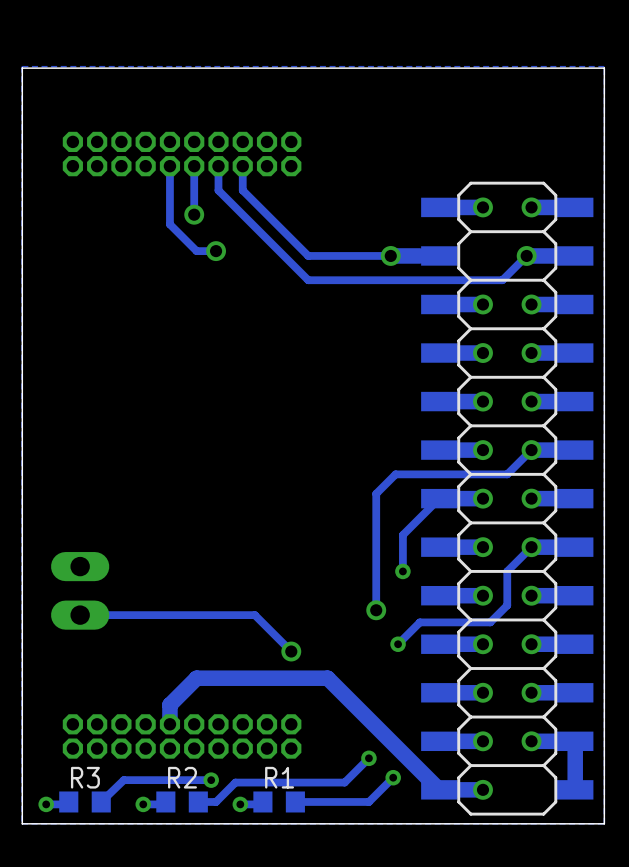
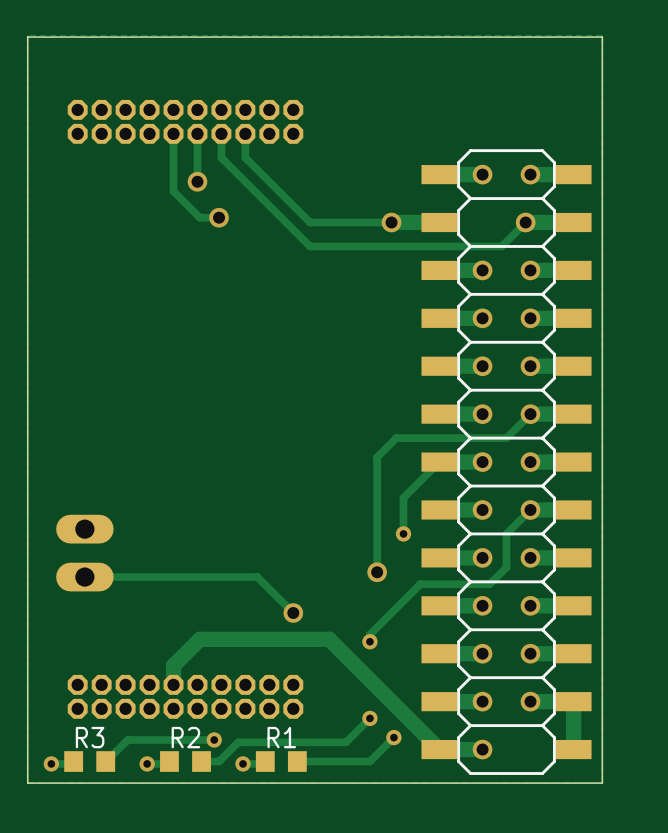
track: none -> (398, 605) (369, 634) (369, 641)
via position: (398, 644) -> (369, 641)

